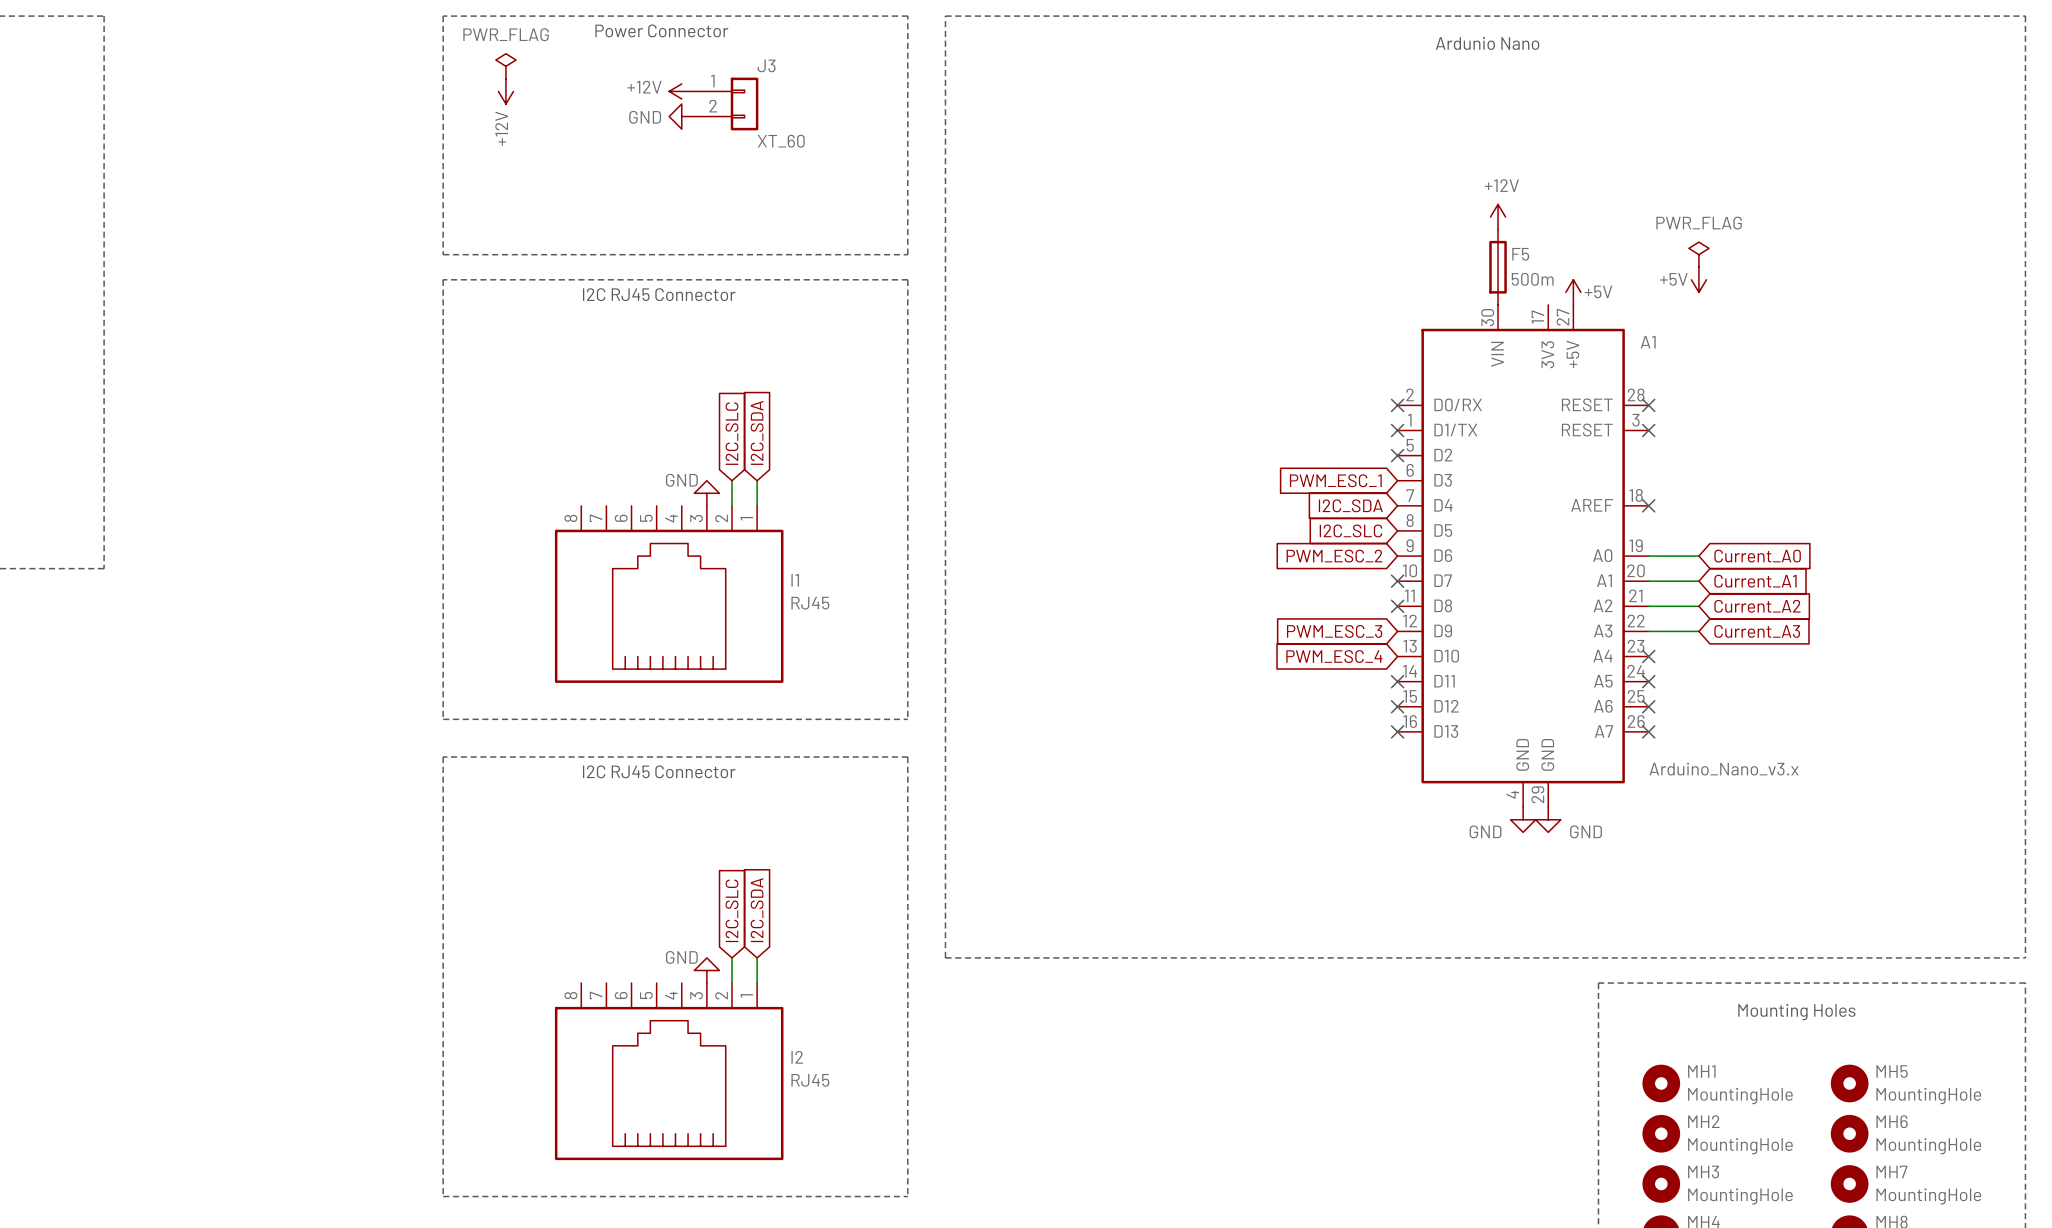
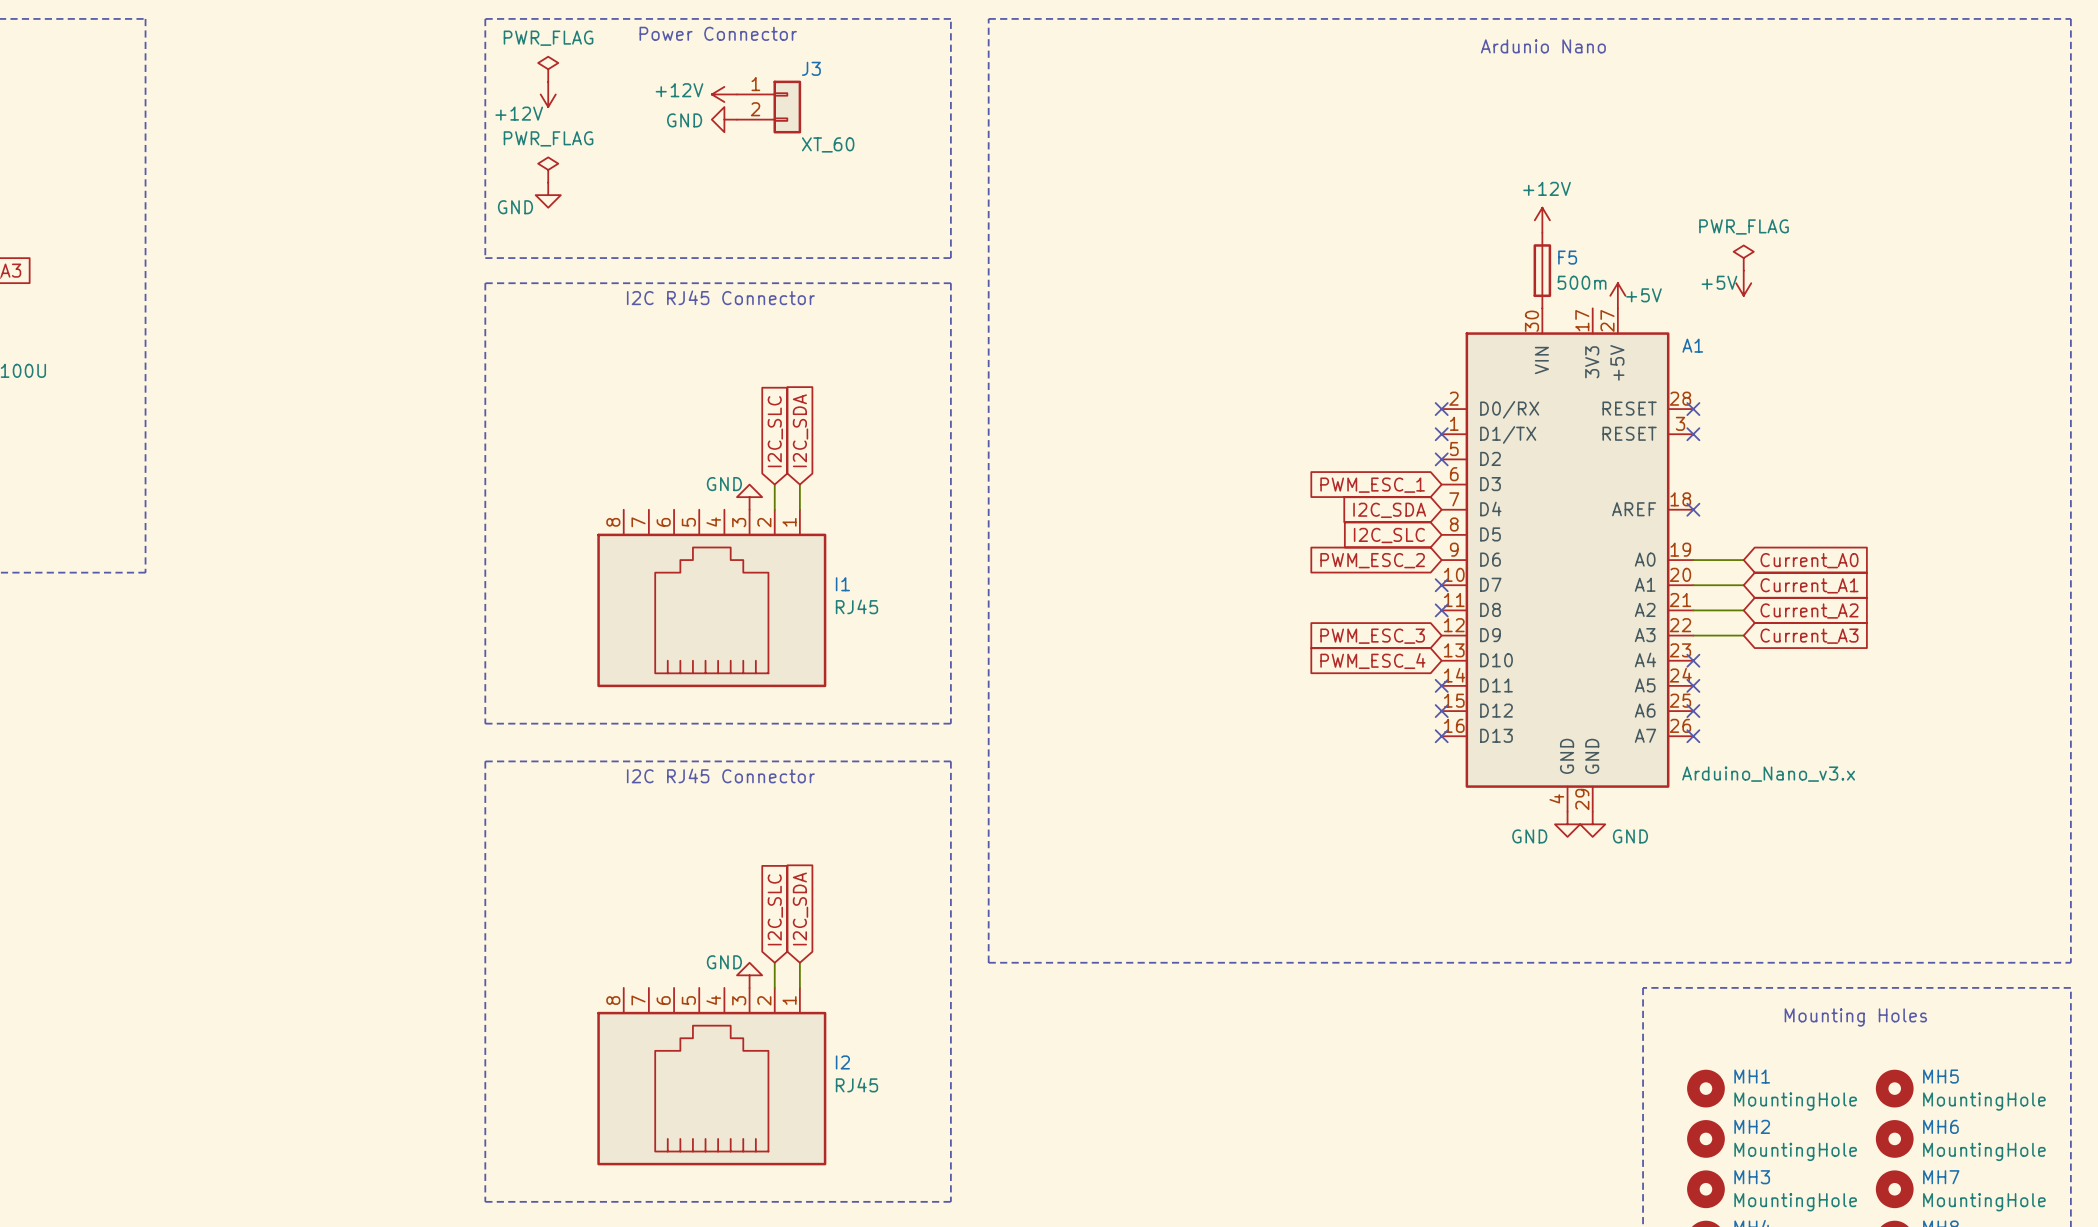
power symbol text rotation: 0° (501, 128) -> 90° clockwise (519, 113)
power symbol: none -> PWR_FLAG (548, 169)
power symbol: none -> GND (548, 195)

